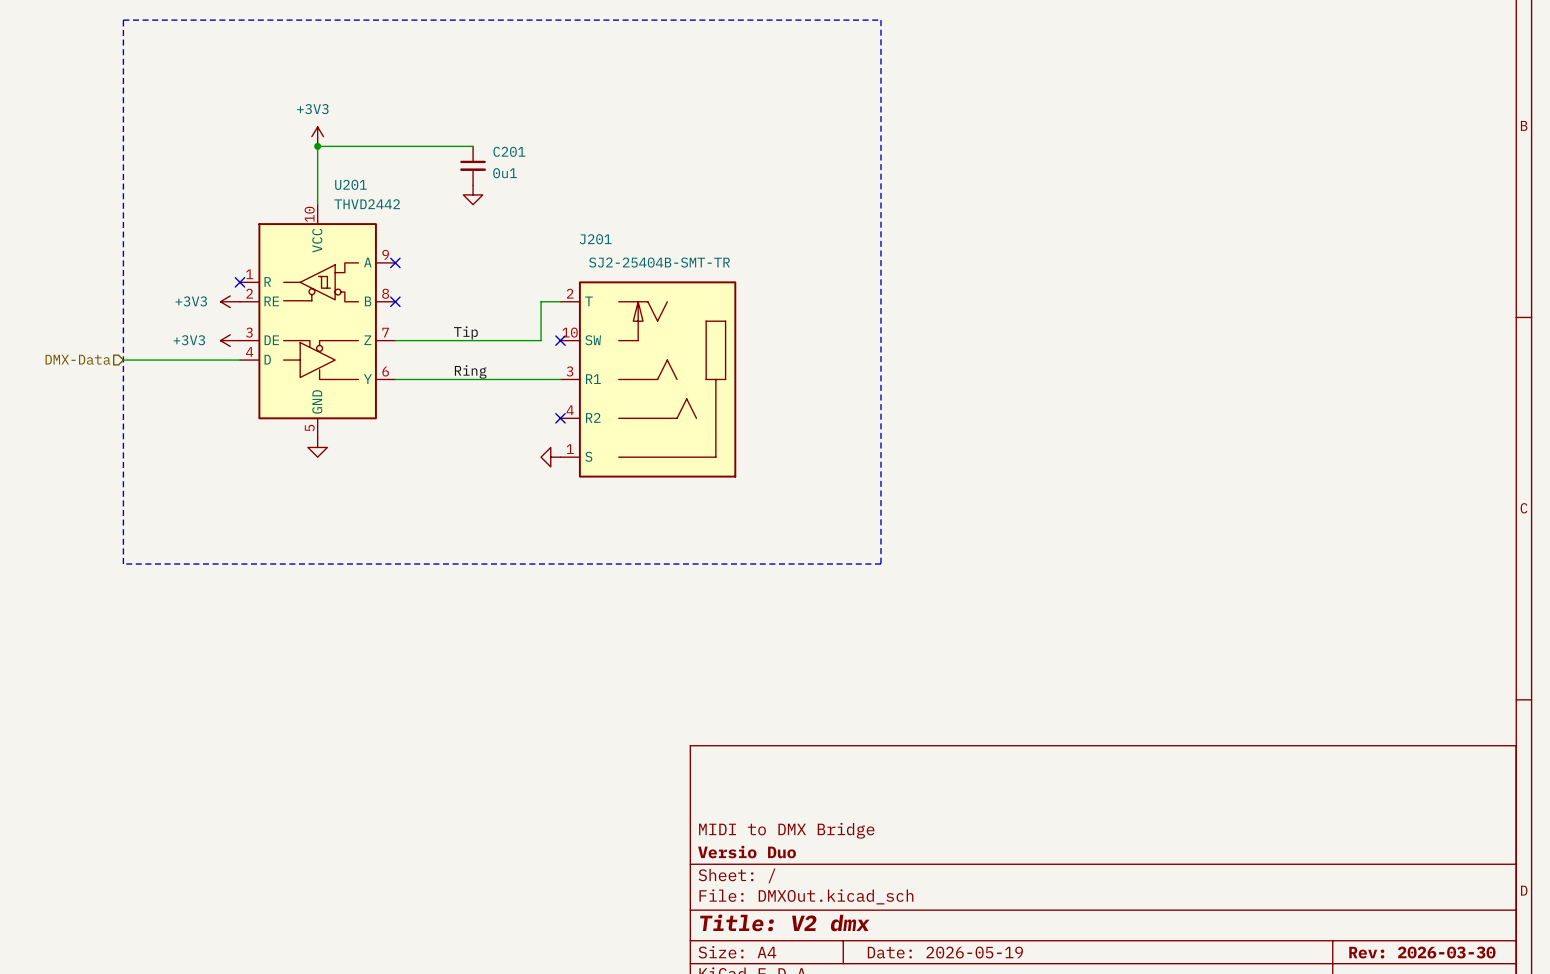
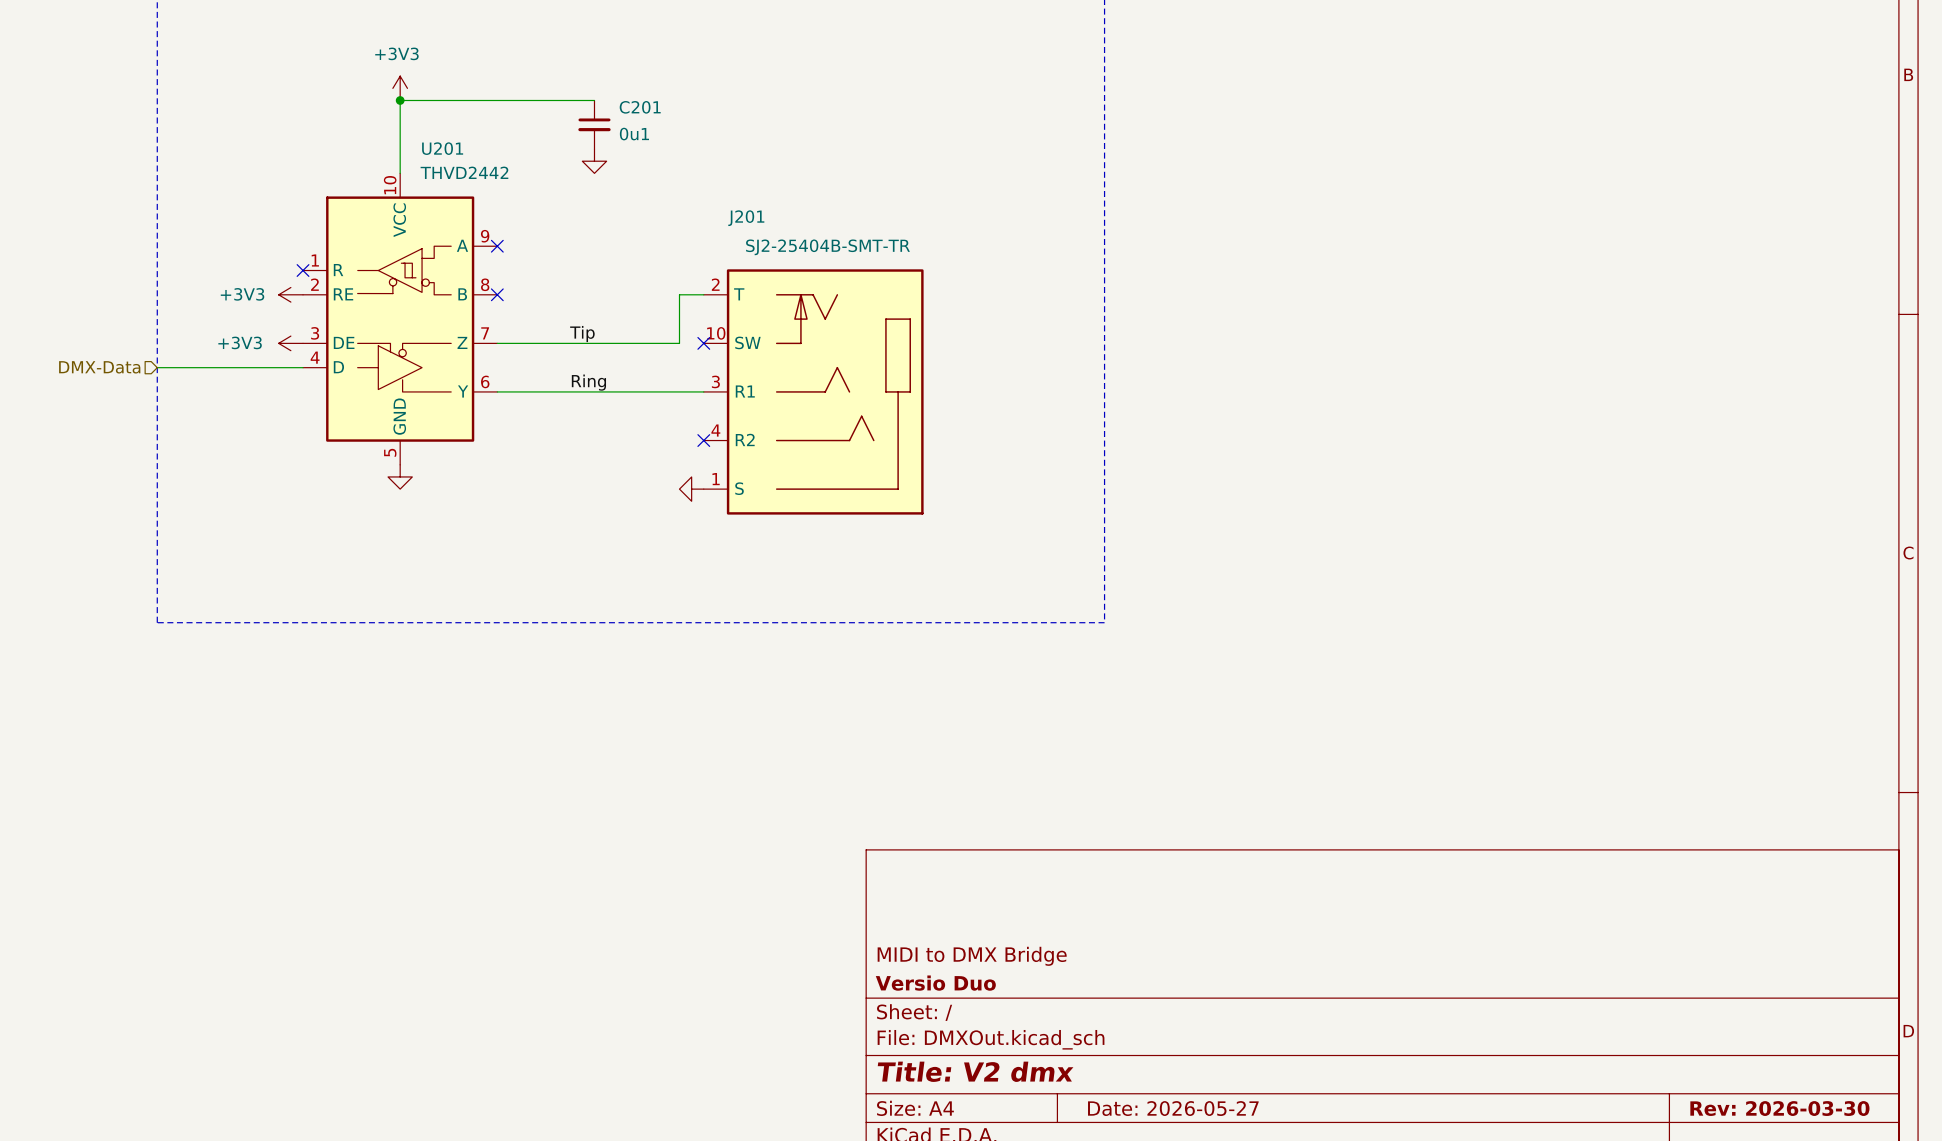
title block: Date: 2026-05-19 (945, 952) -> Date: 2026-05-27 (1173, 1108)

